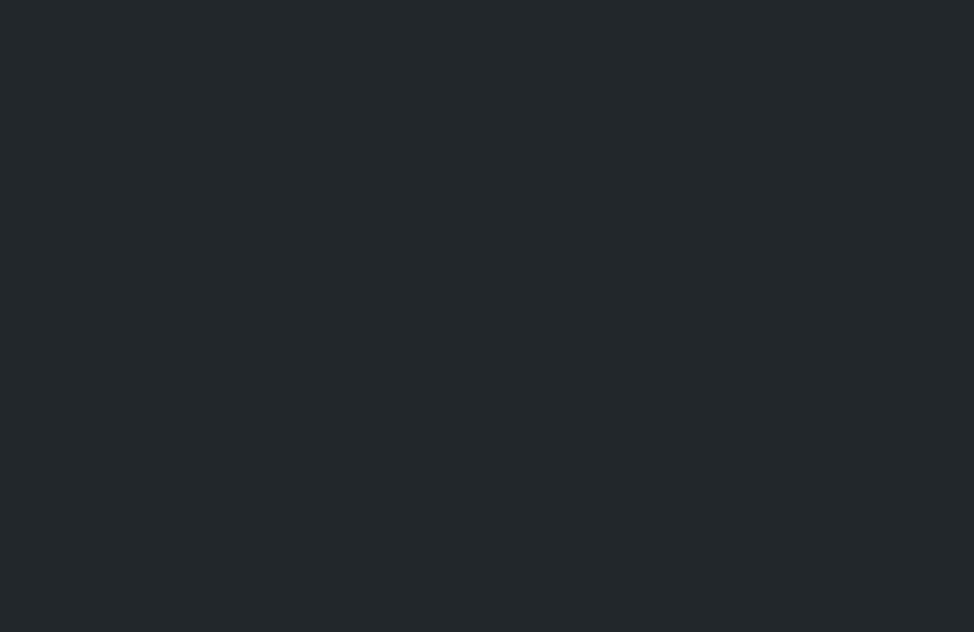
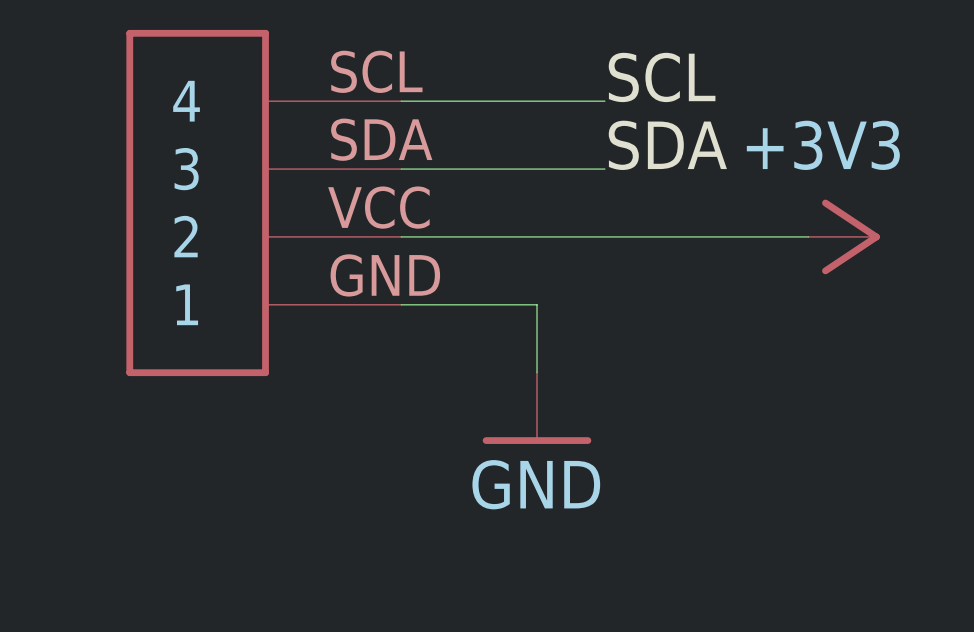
label: none -> SCL (662, 77)
wire: none -> (401, 101) (604, 101)
label: none -> SDA (667, 145)
wire: none -> (401, 169) (604, 169)
part: none -> (263, 203)
wire: none -> (401, 236) (808, 236)
power symbol: none -> +3V3 (844, 236)
wire: none -> (401, 304) (537, 304) (537, 372)
power symbol: none -> GND (537, 408)

